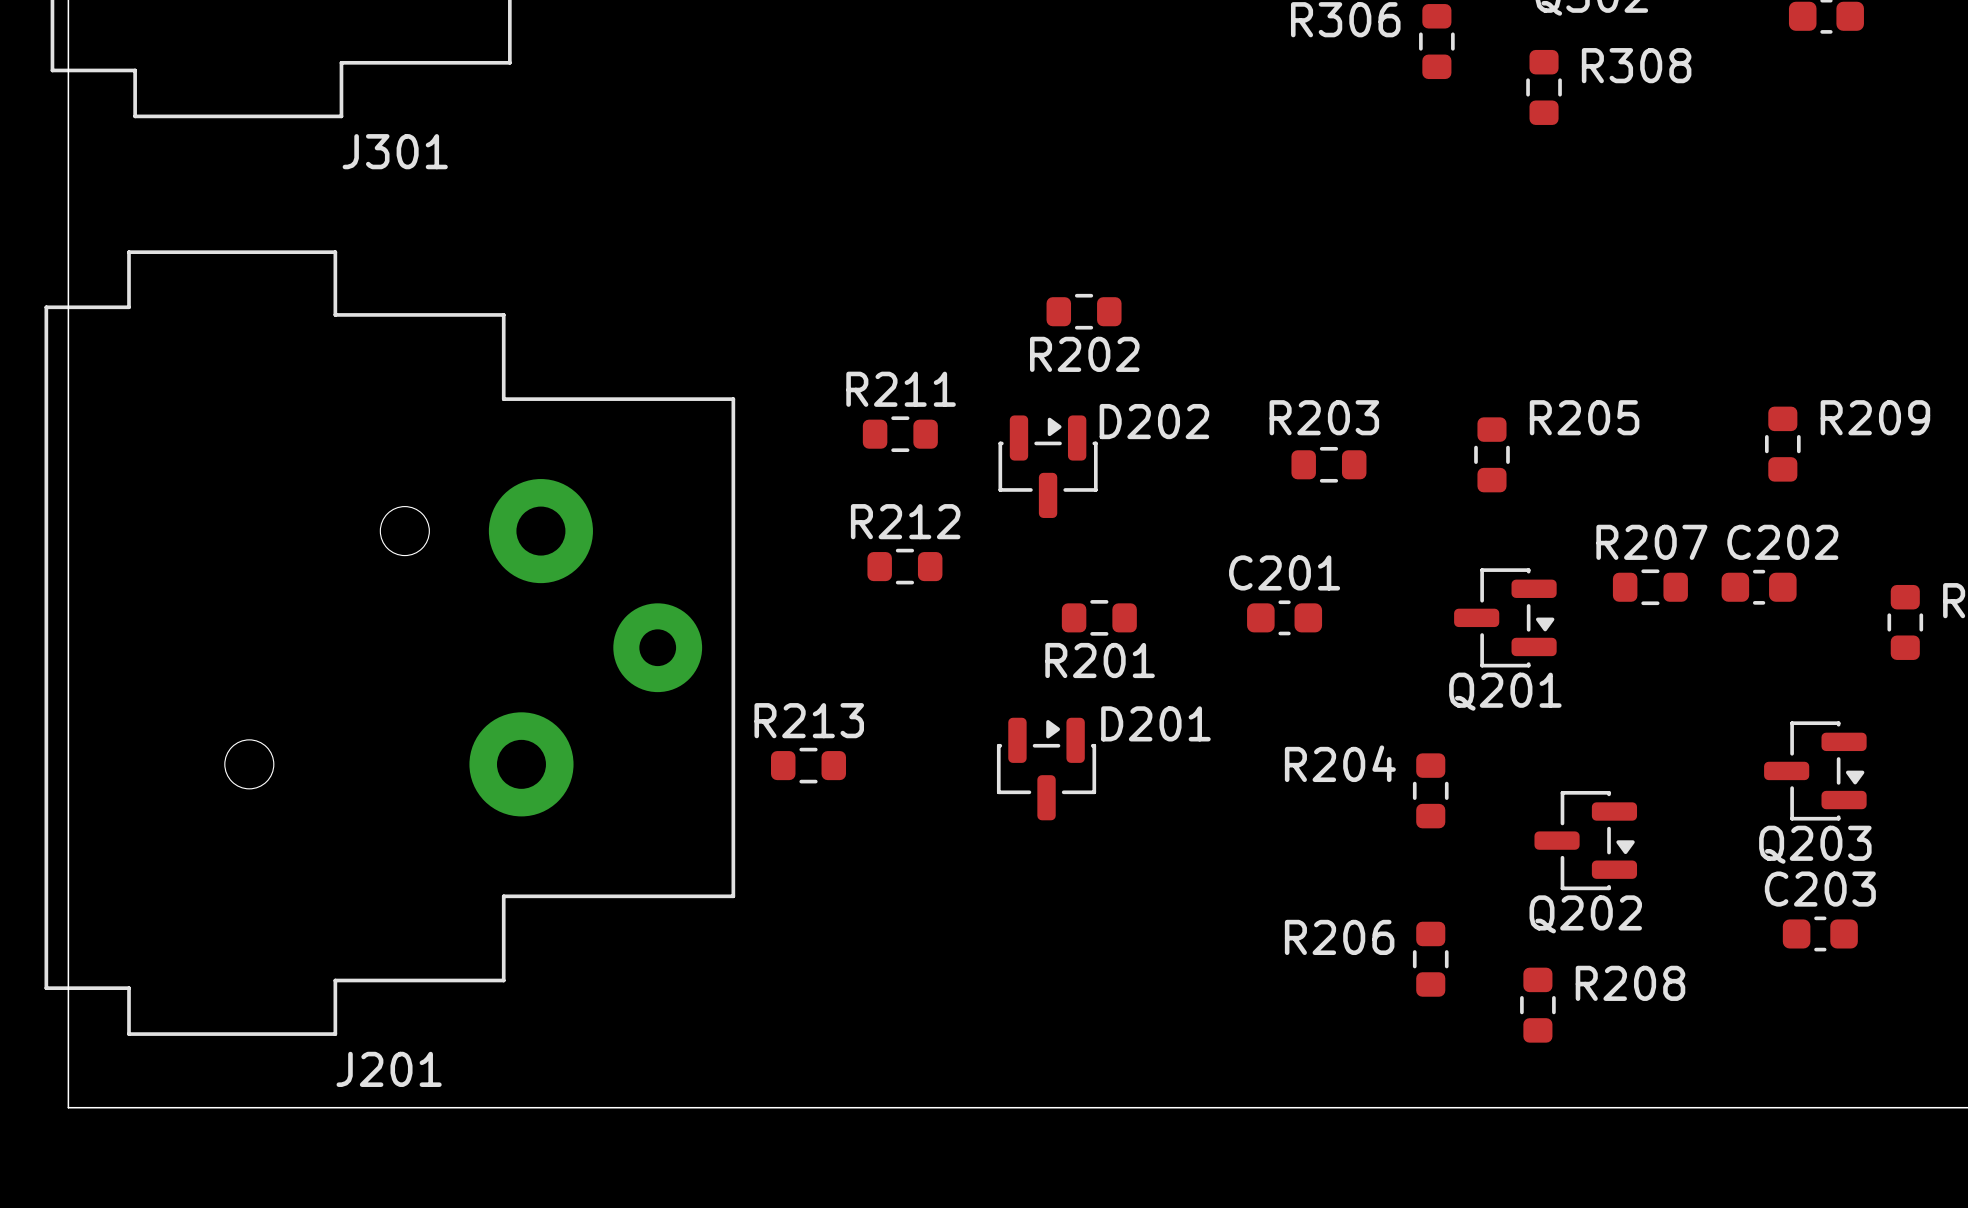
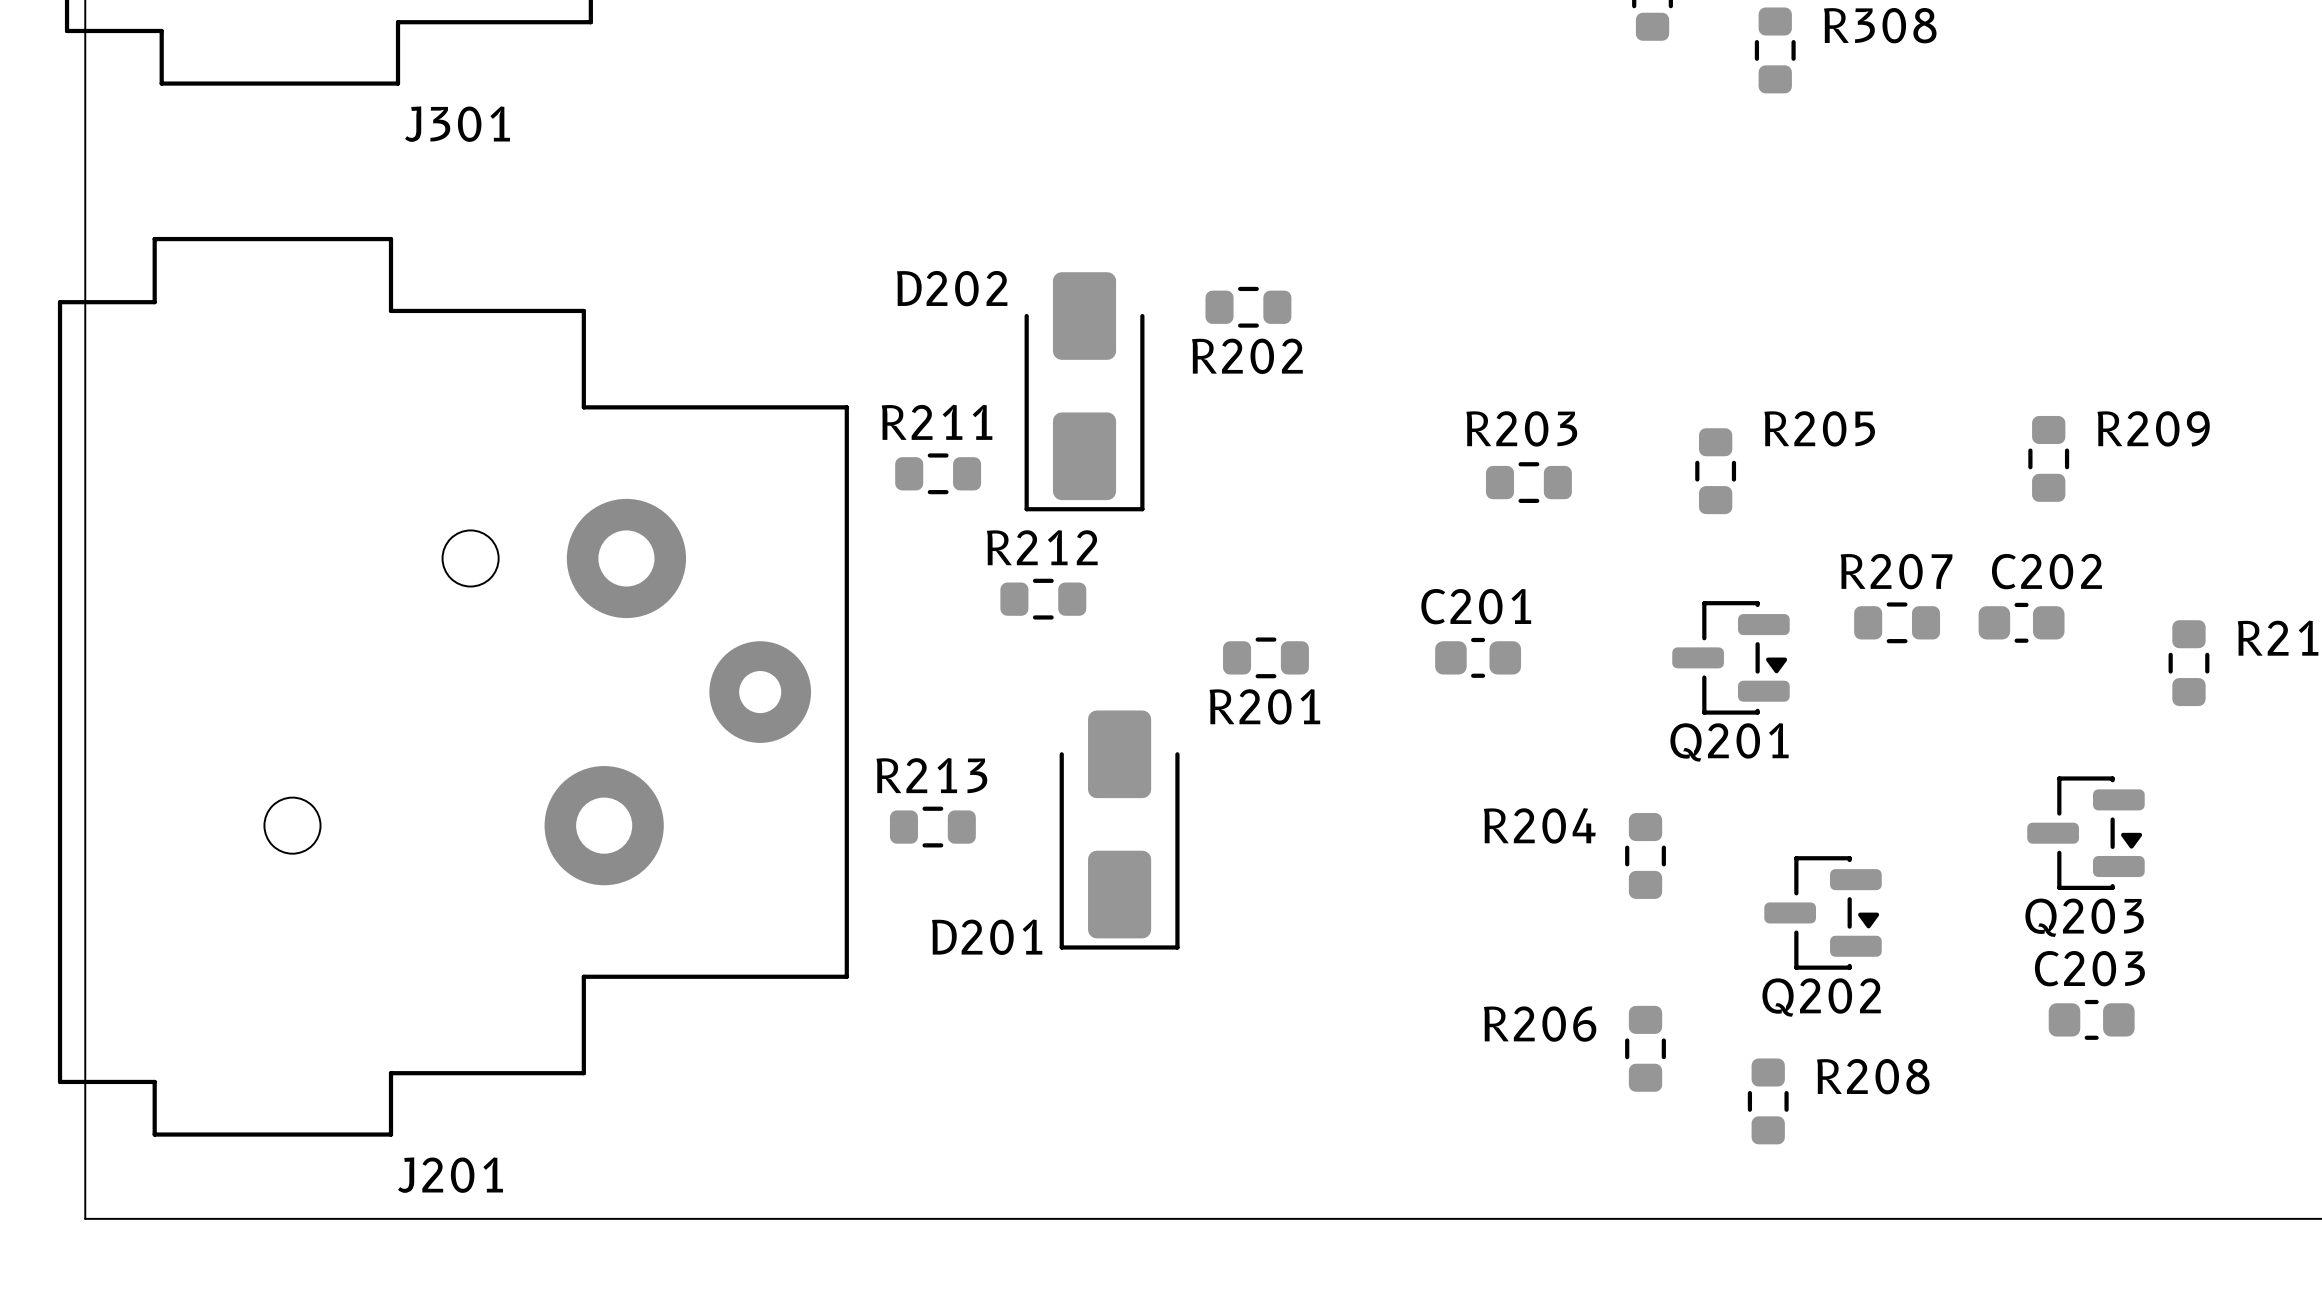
D202 footprint: [998, 415, 1098, 518] -> [1024, 272, 1145, 512]
D202 name position: D202 (1154, 421) -> D202 (952, 288)
R211 position: (900, 434) -> (938, 473)
D201 footprint: [996, 717, 1097, 821] -> [1059, 710, 1180, 950]
D201 name position: D201 (1155, 723) -> D201 (987, 937)

